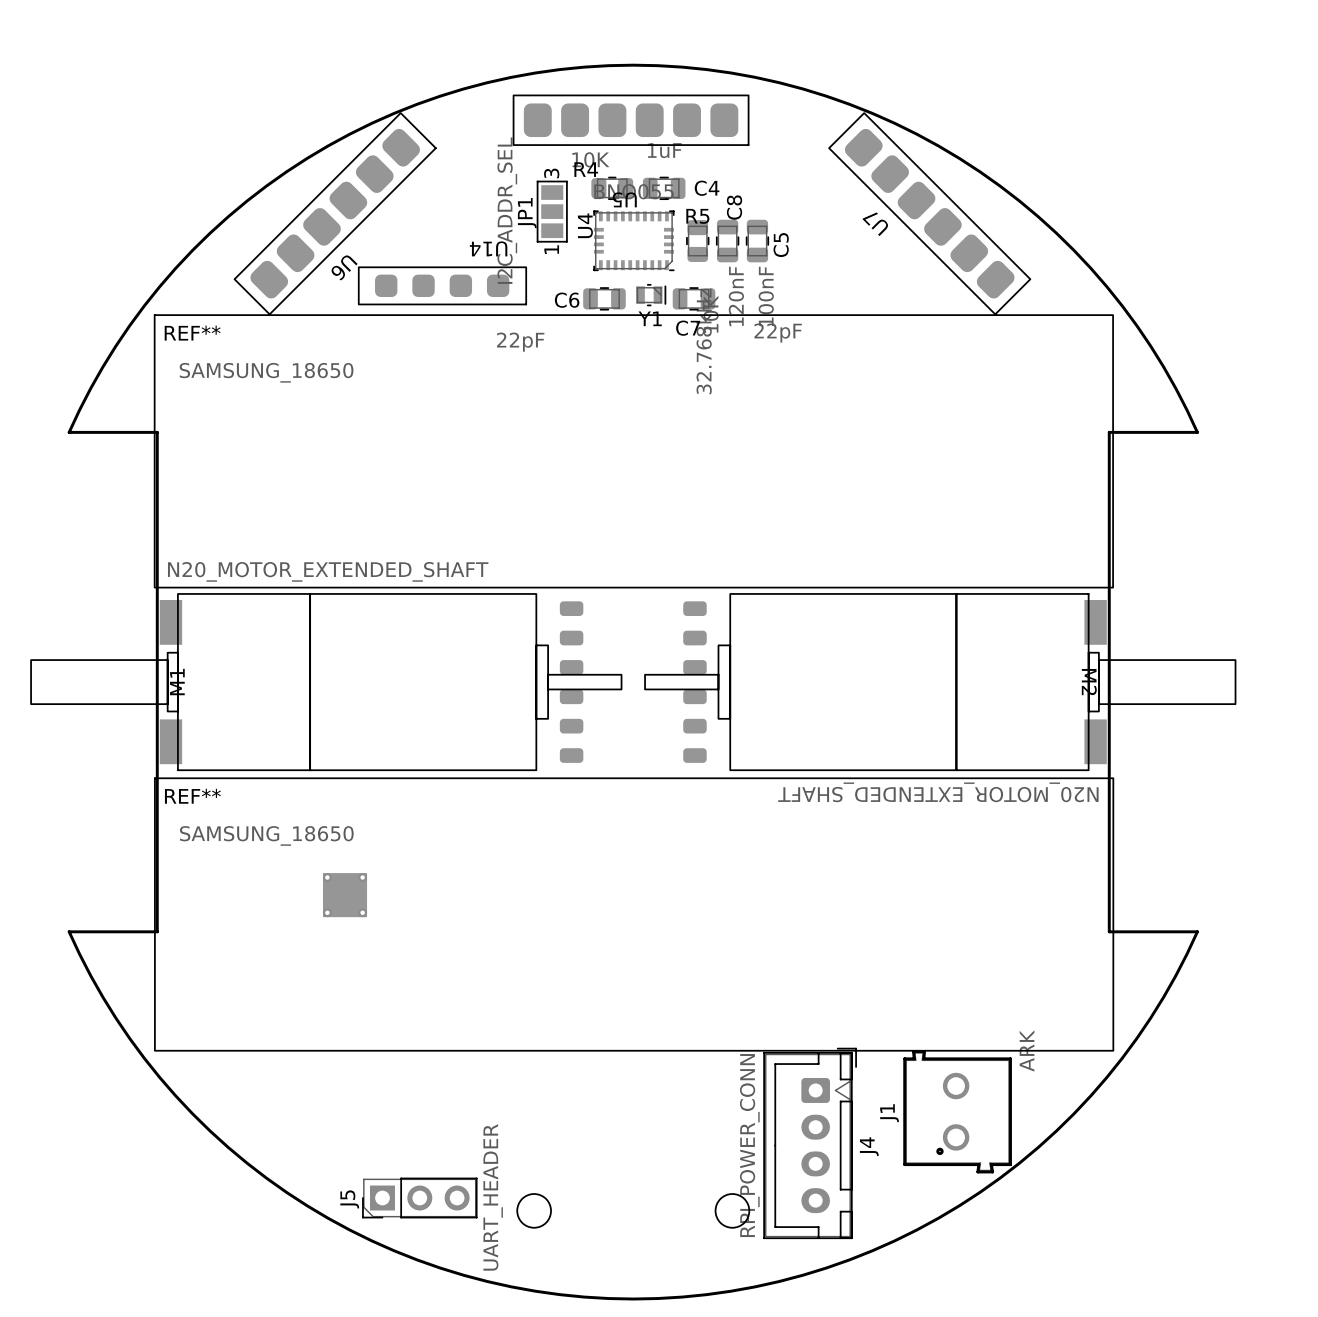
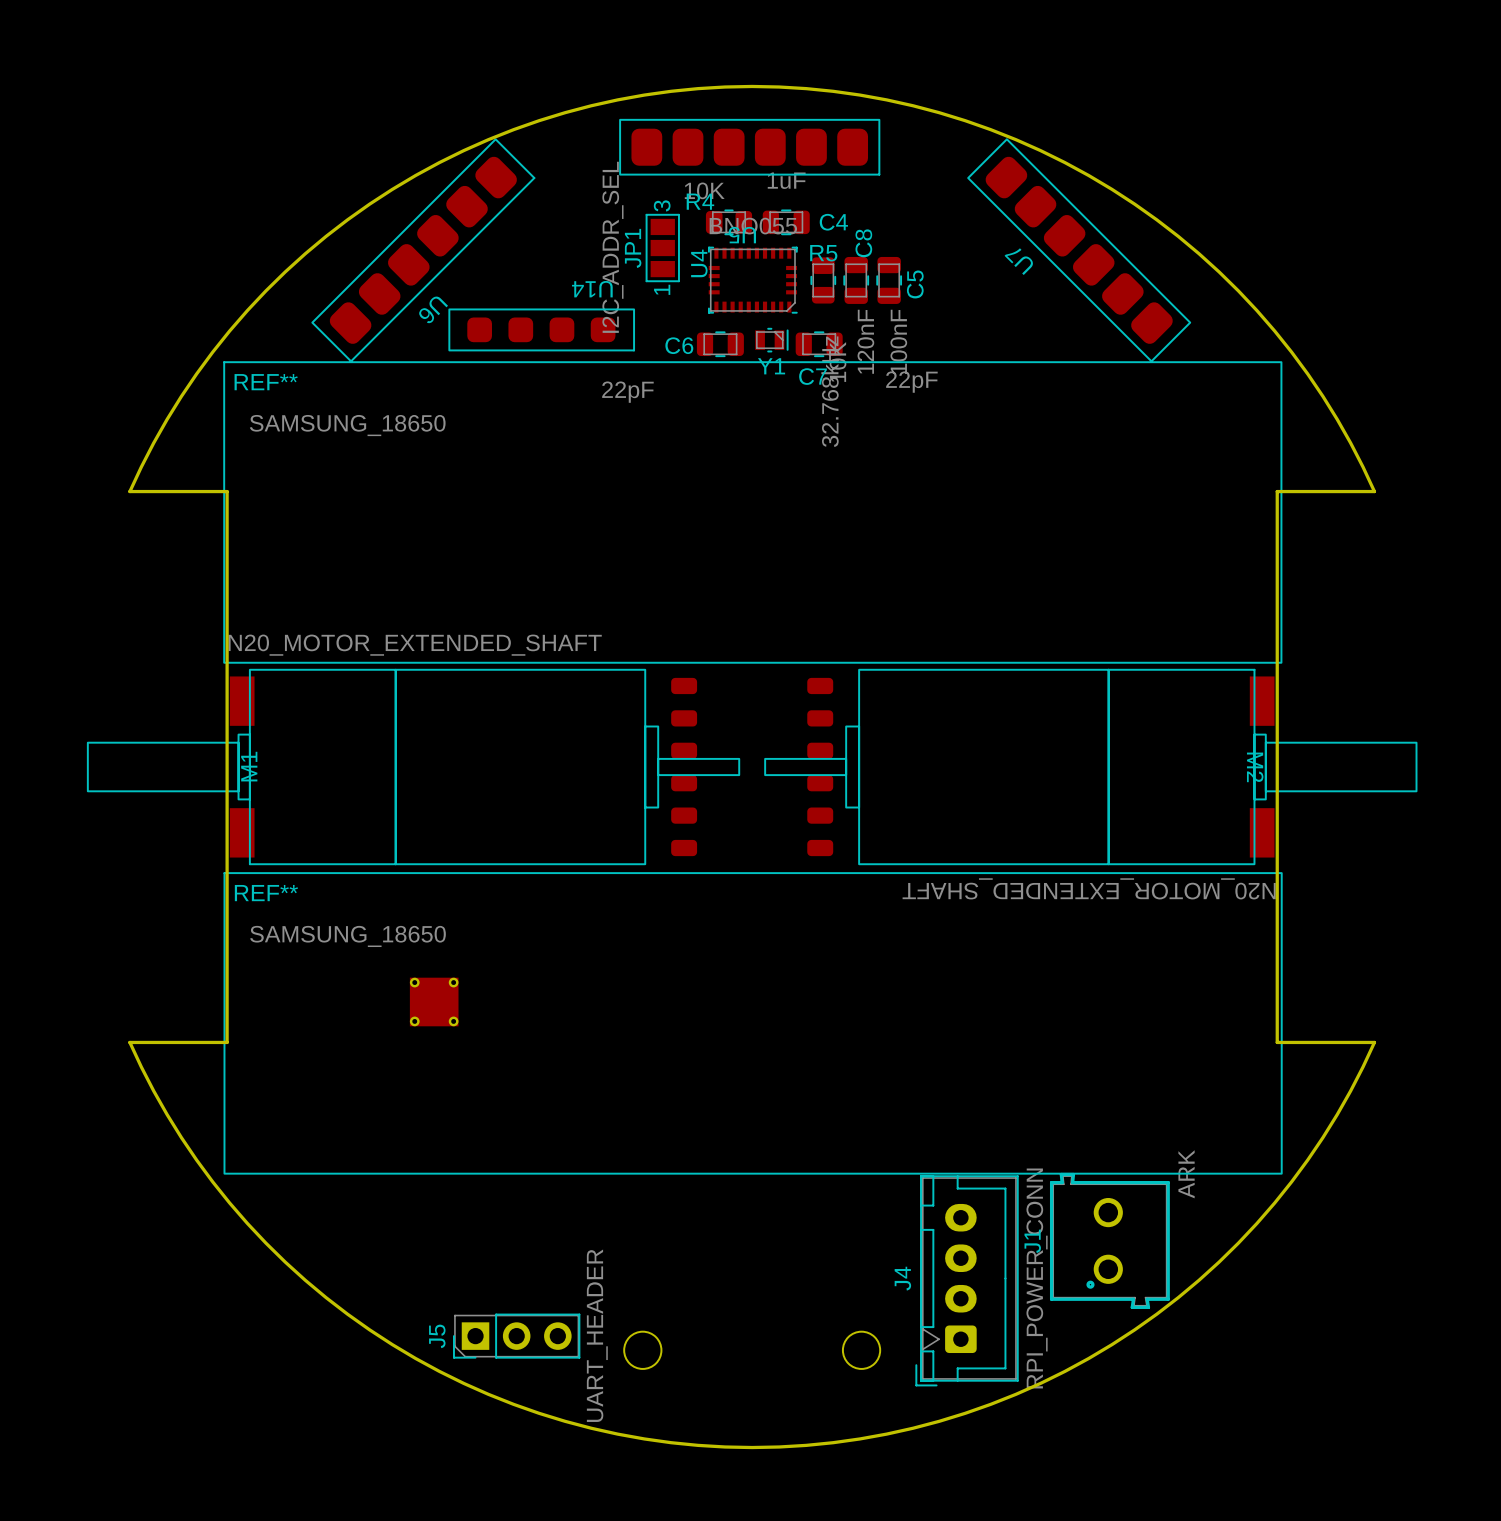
J4 rotation: 0° (810, 1143) -> 180° (967, 1280)

